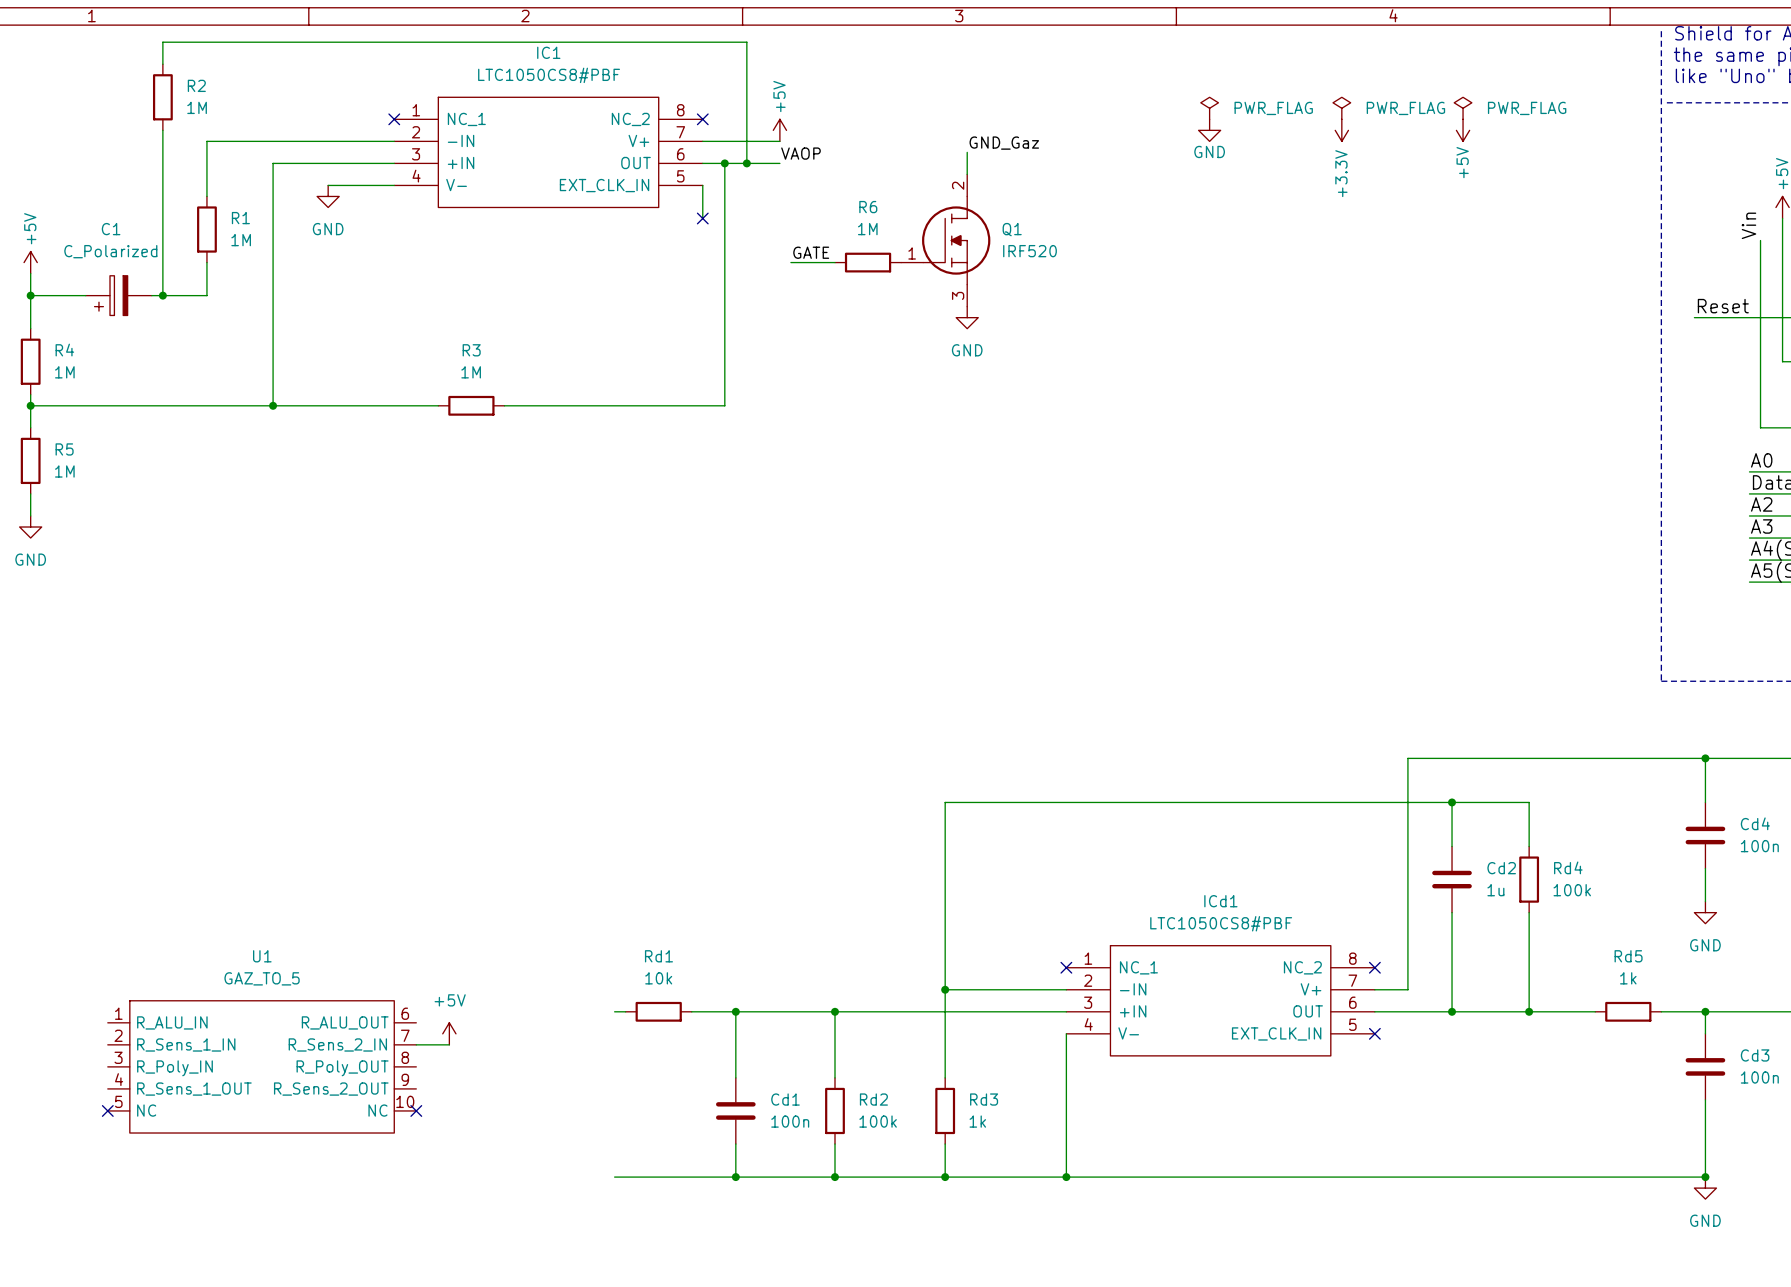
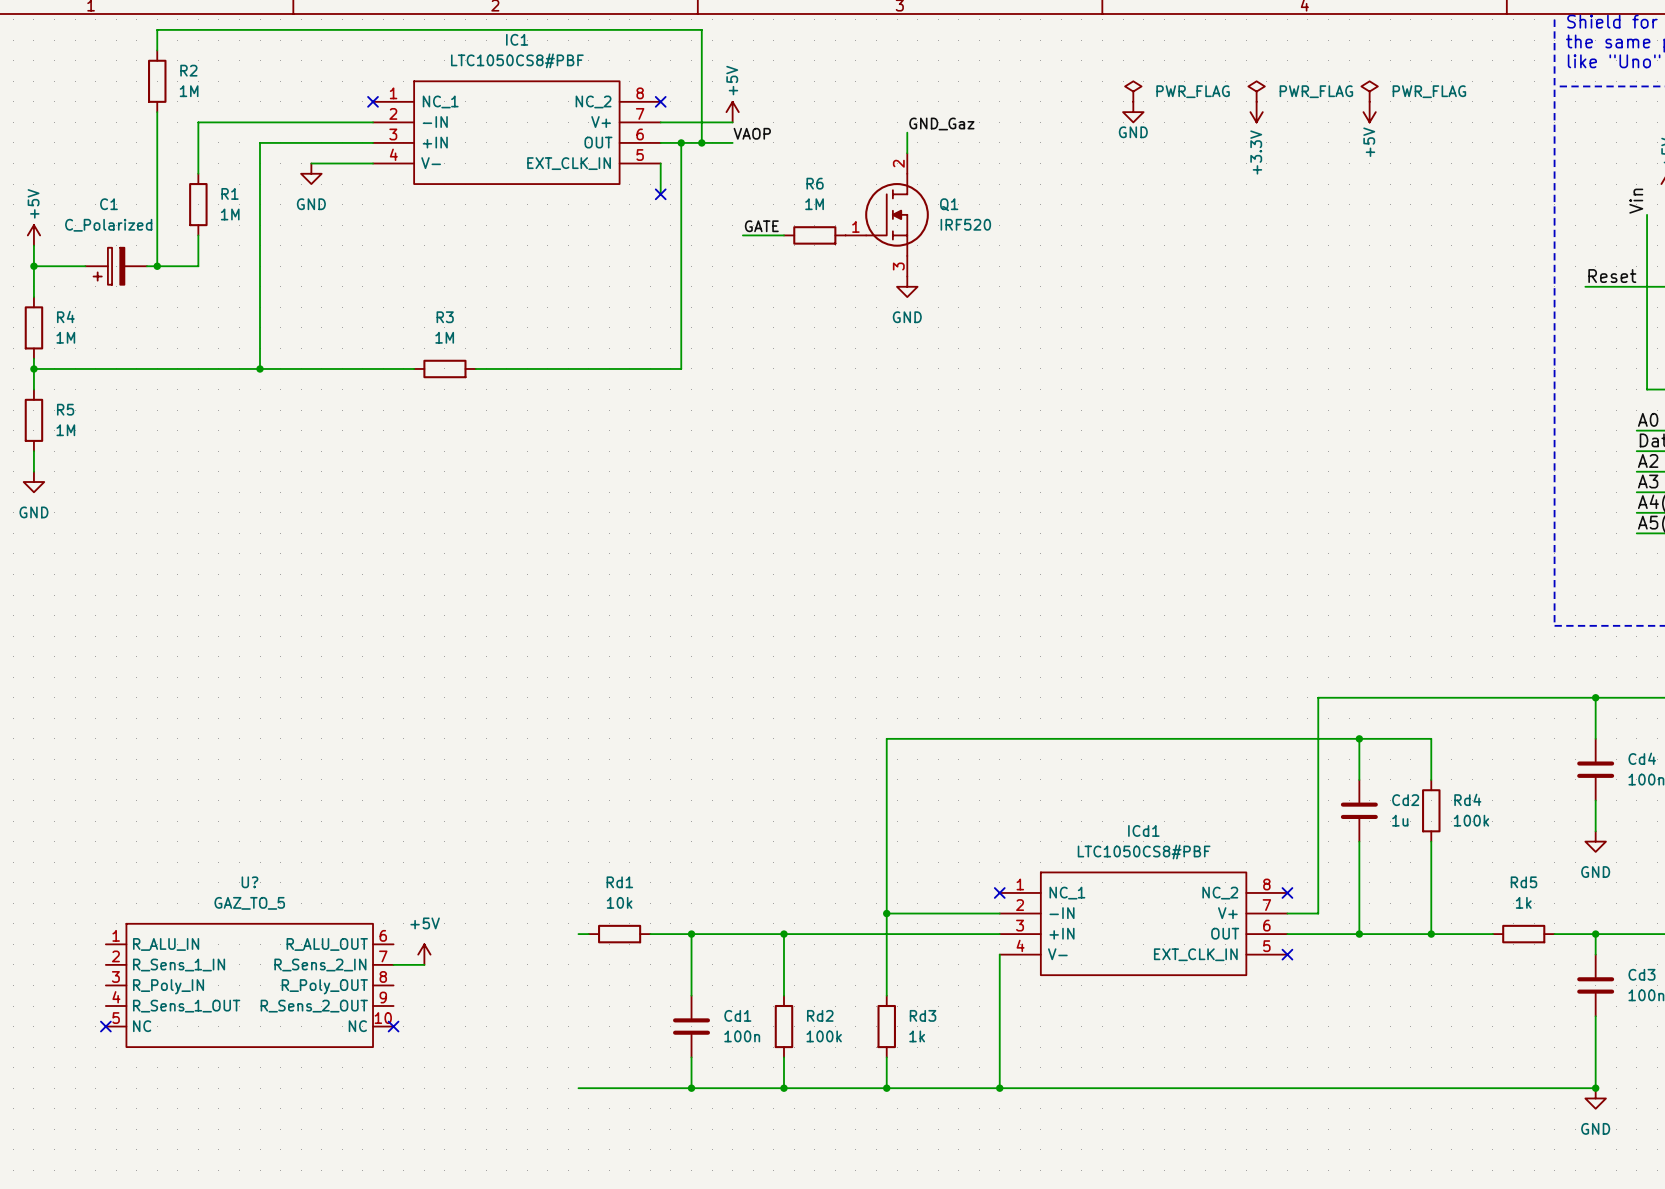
U1 name: U1 (262, 956) -> U? (249, 882)

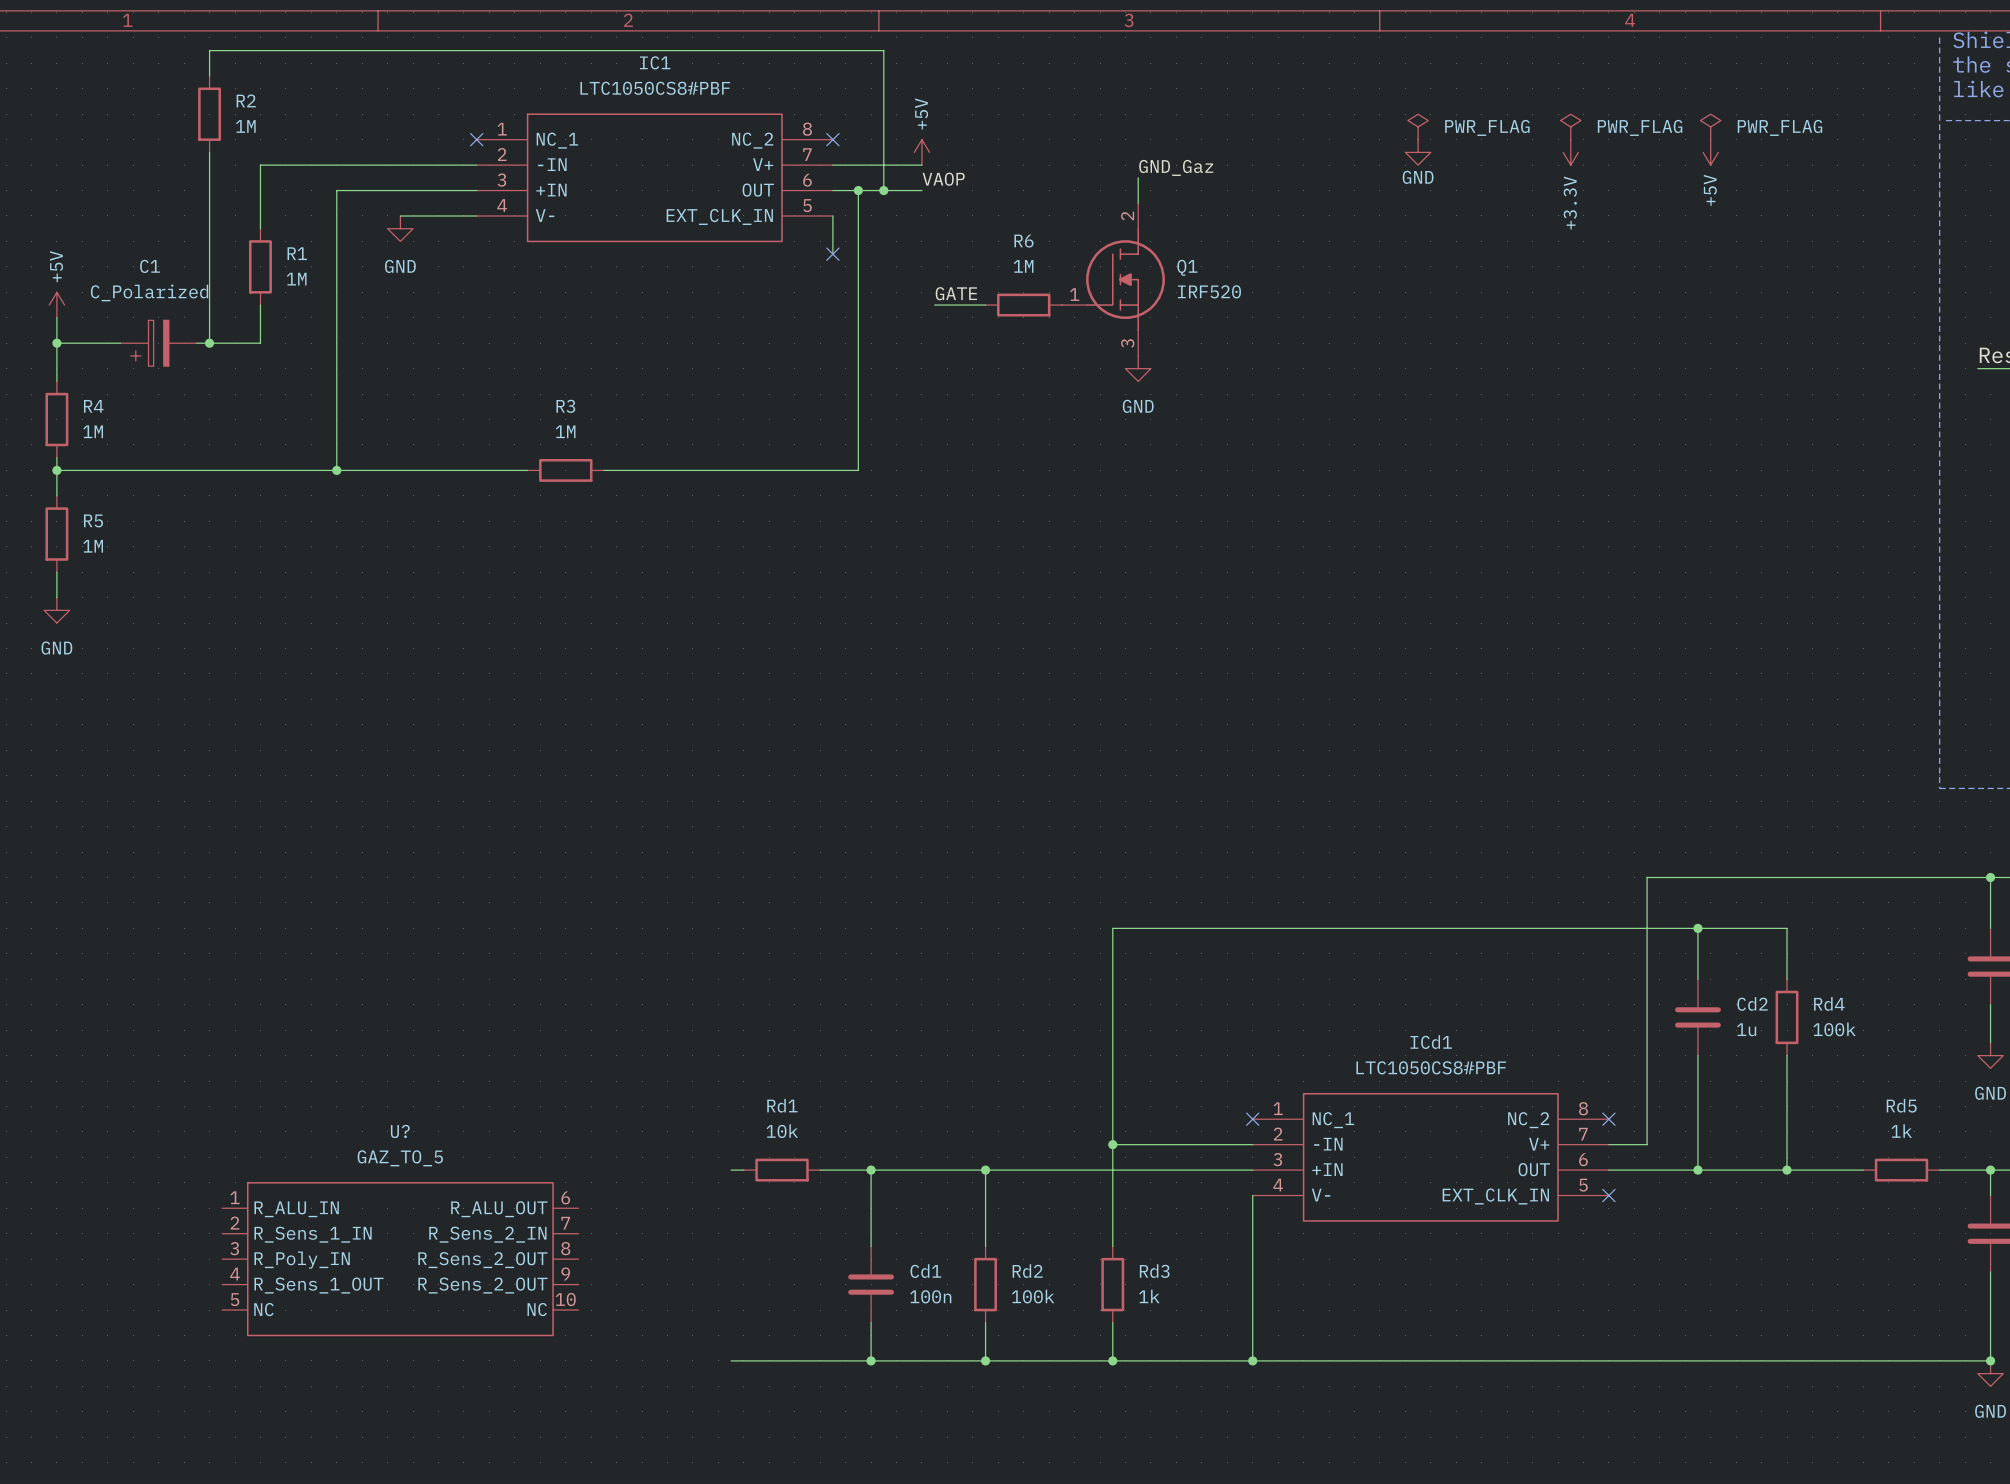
power symbol: +5V (424, 954) -> none
wire: (393, 964) (424, 964) -> none
U?: GAZ_TO_5 (249, 985) -> none
U?: none -> GAZ_TO_5 (400, 1259)
no-connect mark: (105, 1026) -> none
no-connect mark: (393, 1026) -> none

